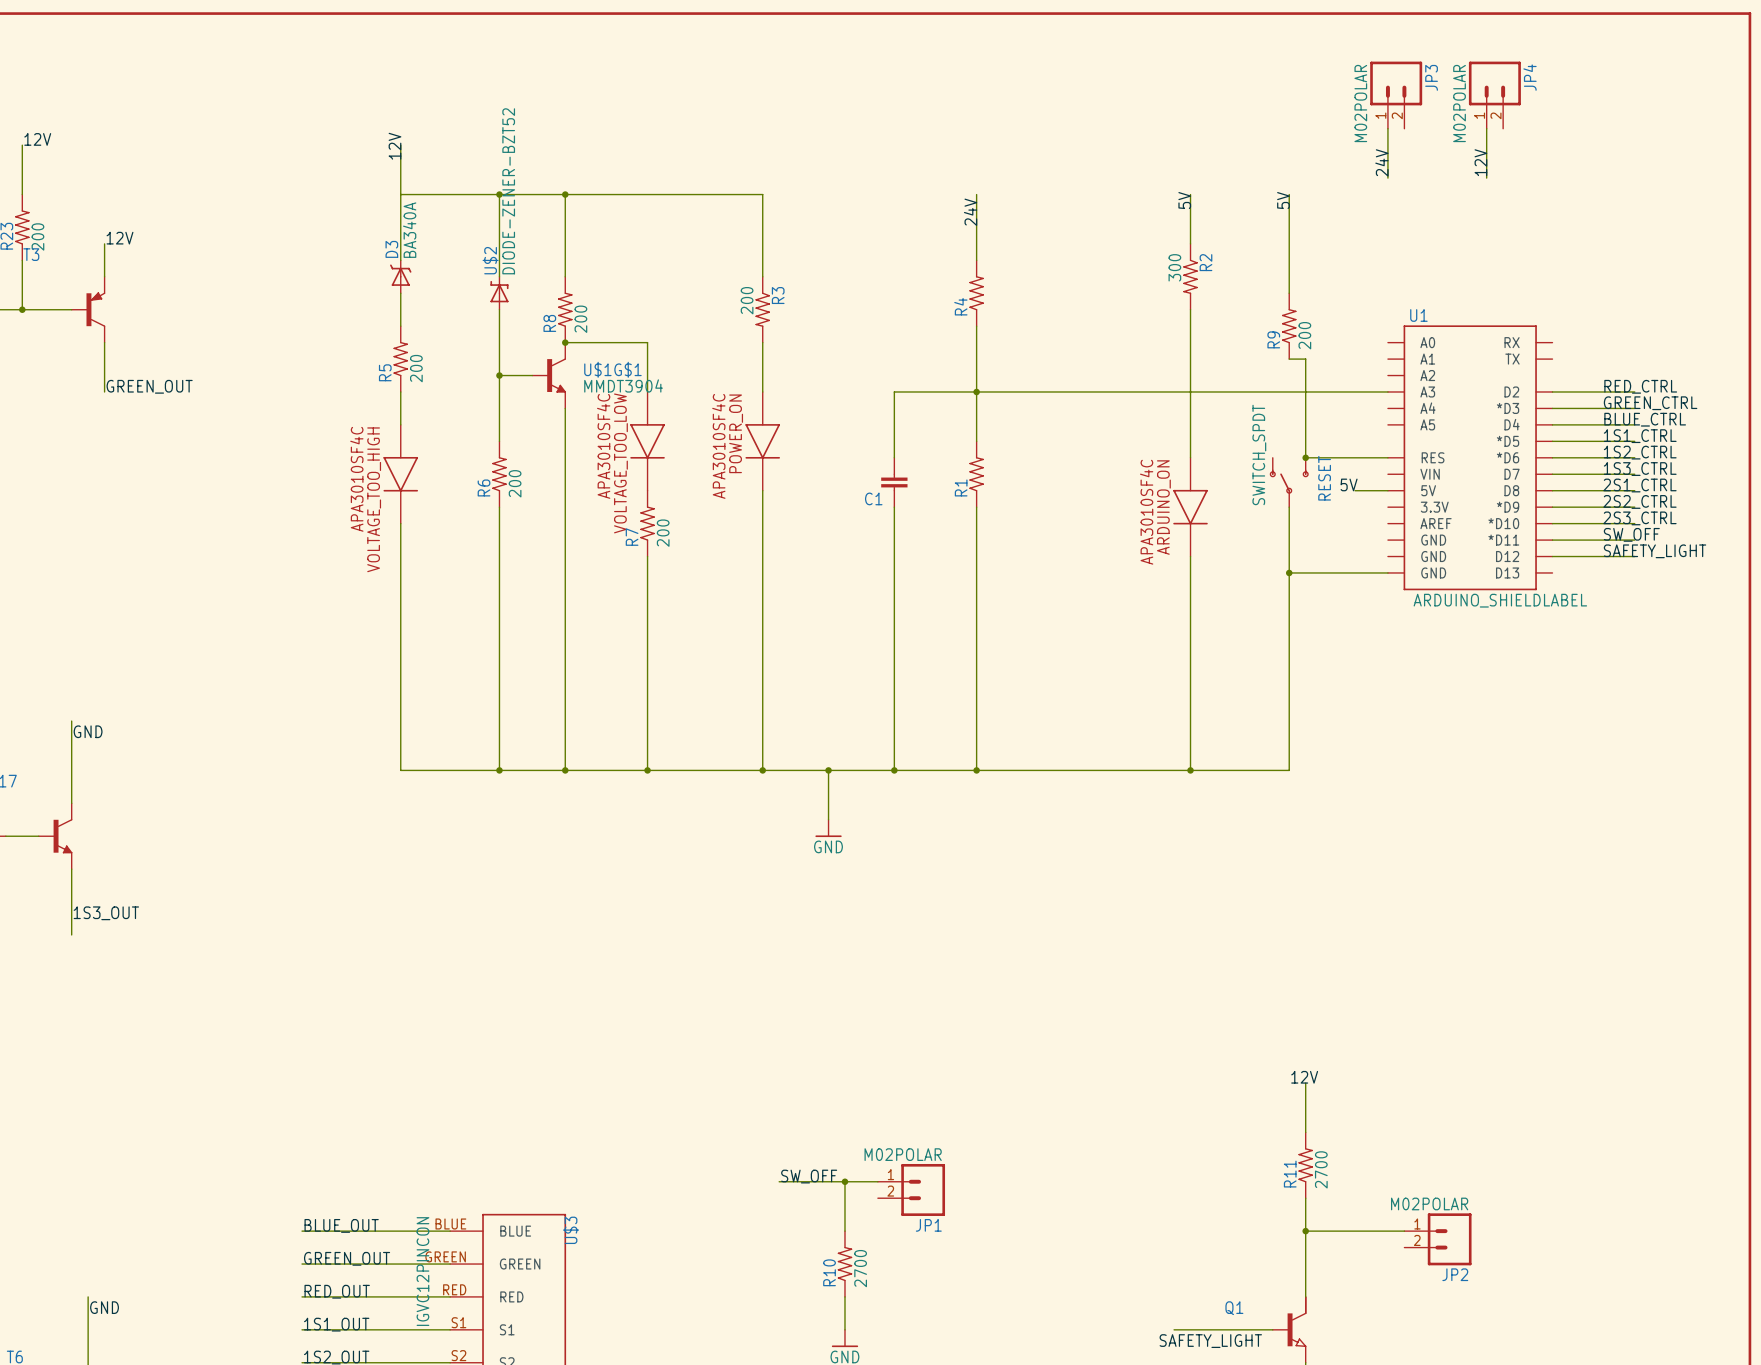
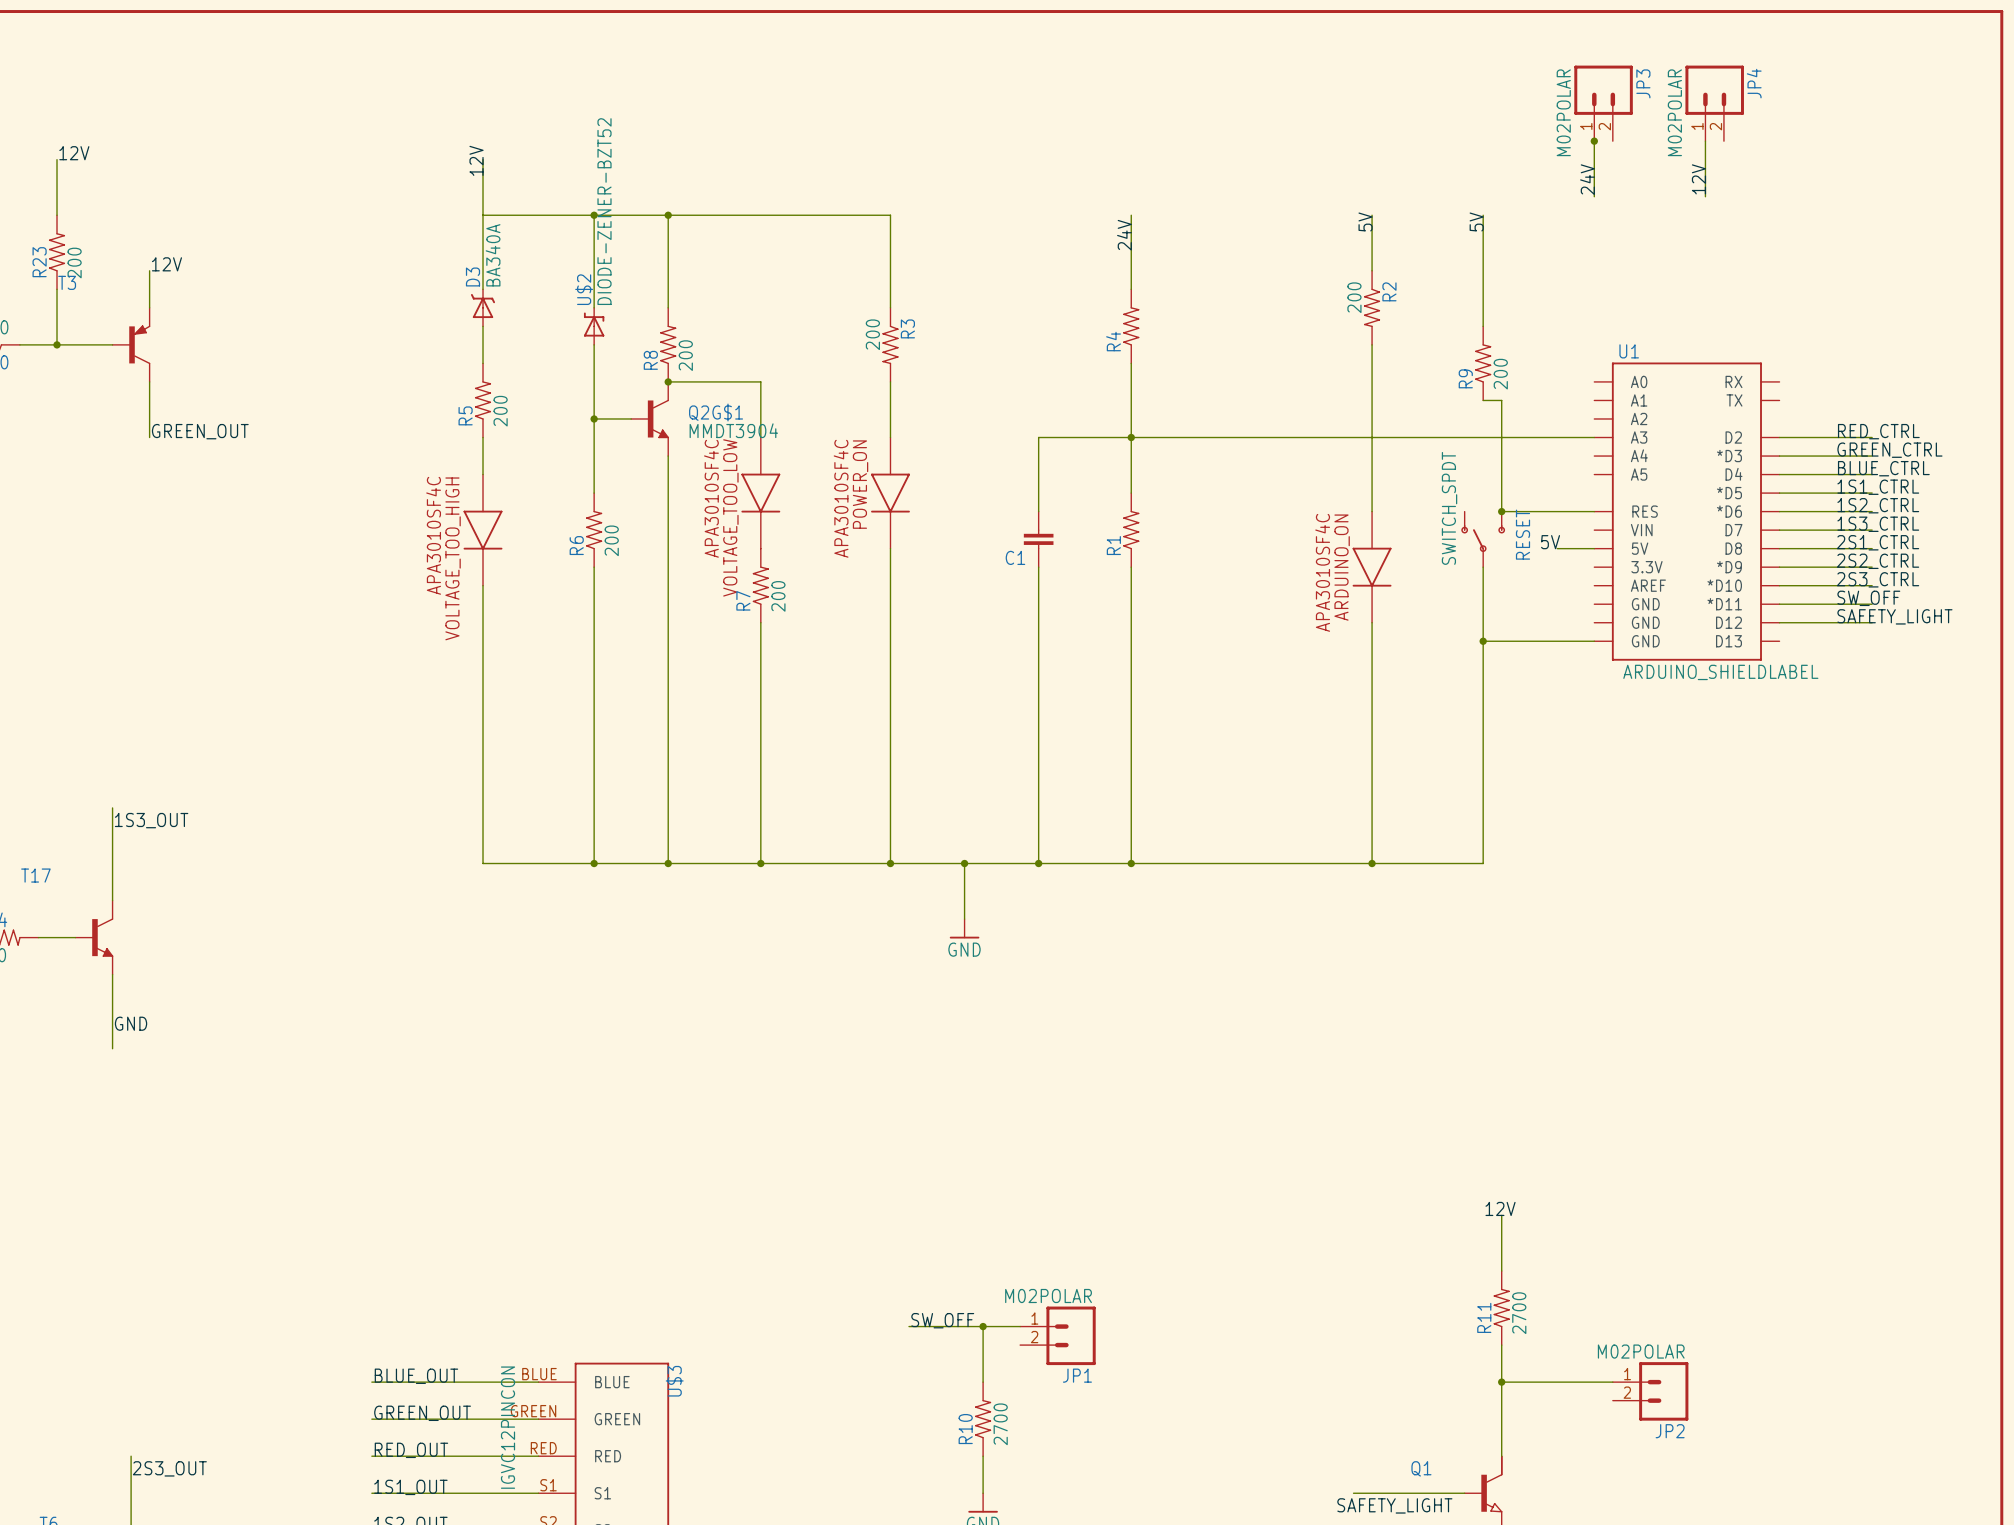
junction: none -> (1594, 141)
R2 value: 300 (1174, 267) -> 200 (1354, 297)
U$1G$1 name: U$1G$1 (612, 369) -> Q2G$1 (716, 412)
label: GND (88, 731) -> 1S3_OUT (151, 820)
label: 1S3_OUT (106, 913) -> GND (131, 1023)
label: GND (104, 1307) -> 2S3_OUT (169, 1468)

